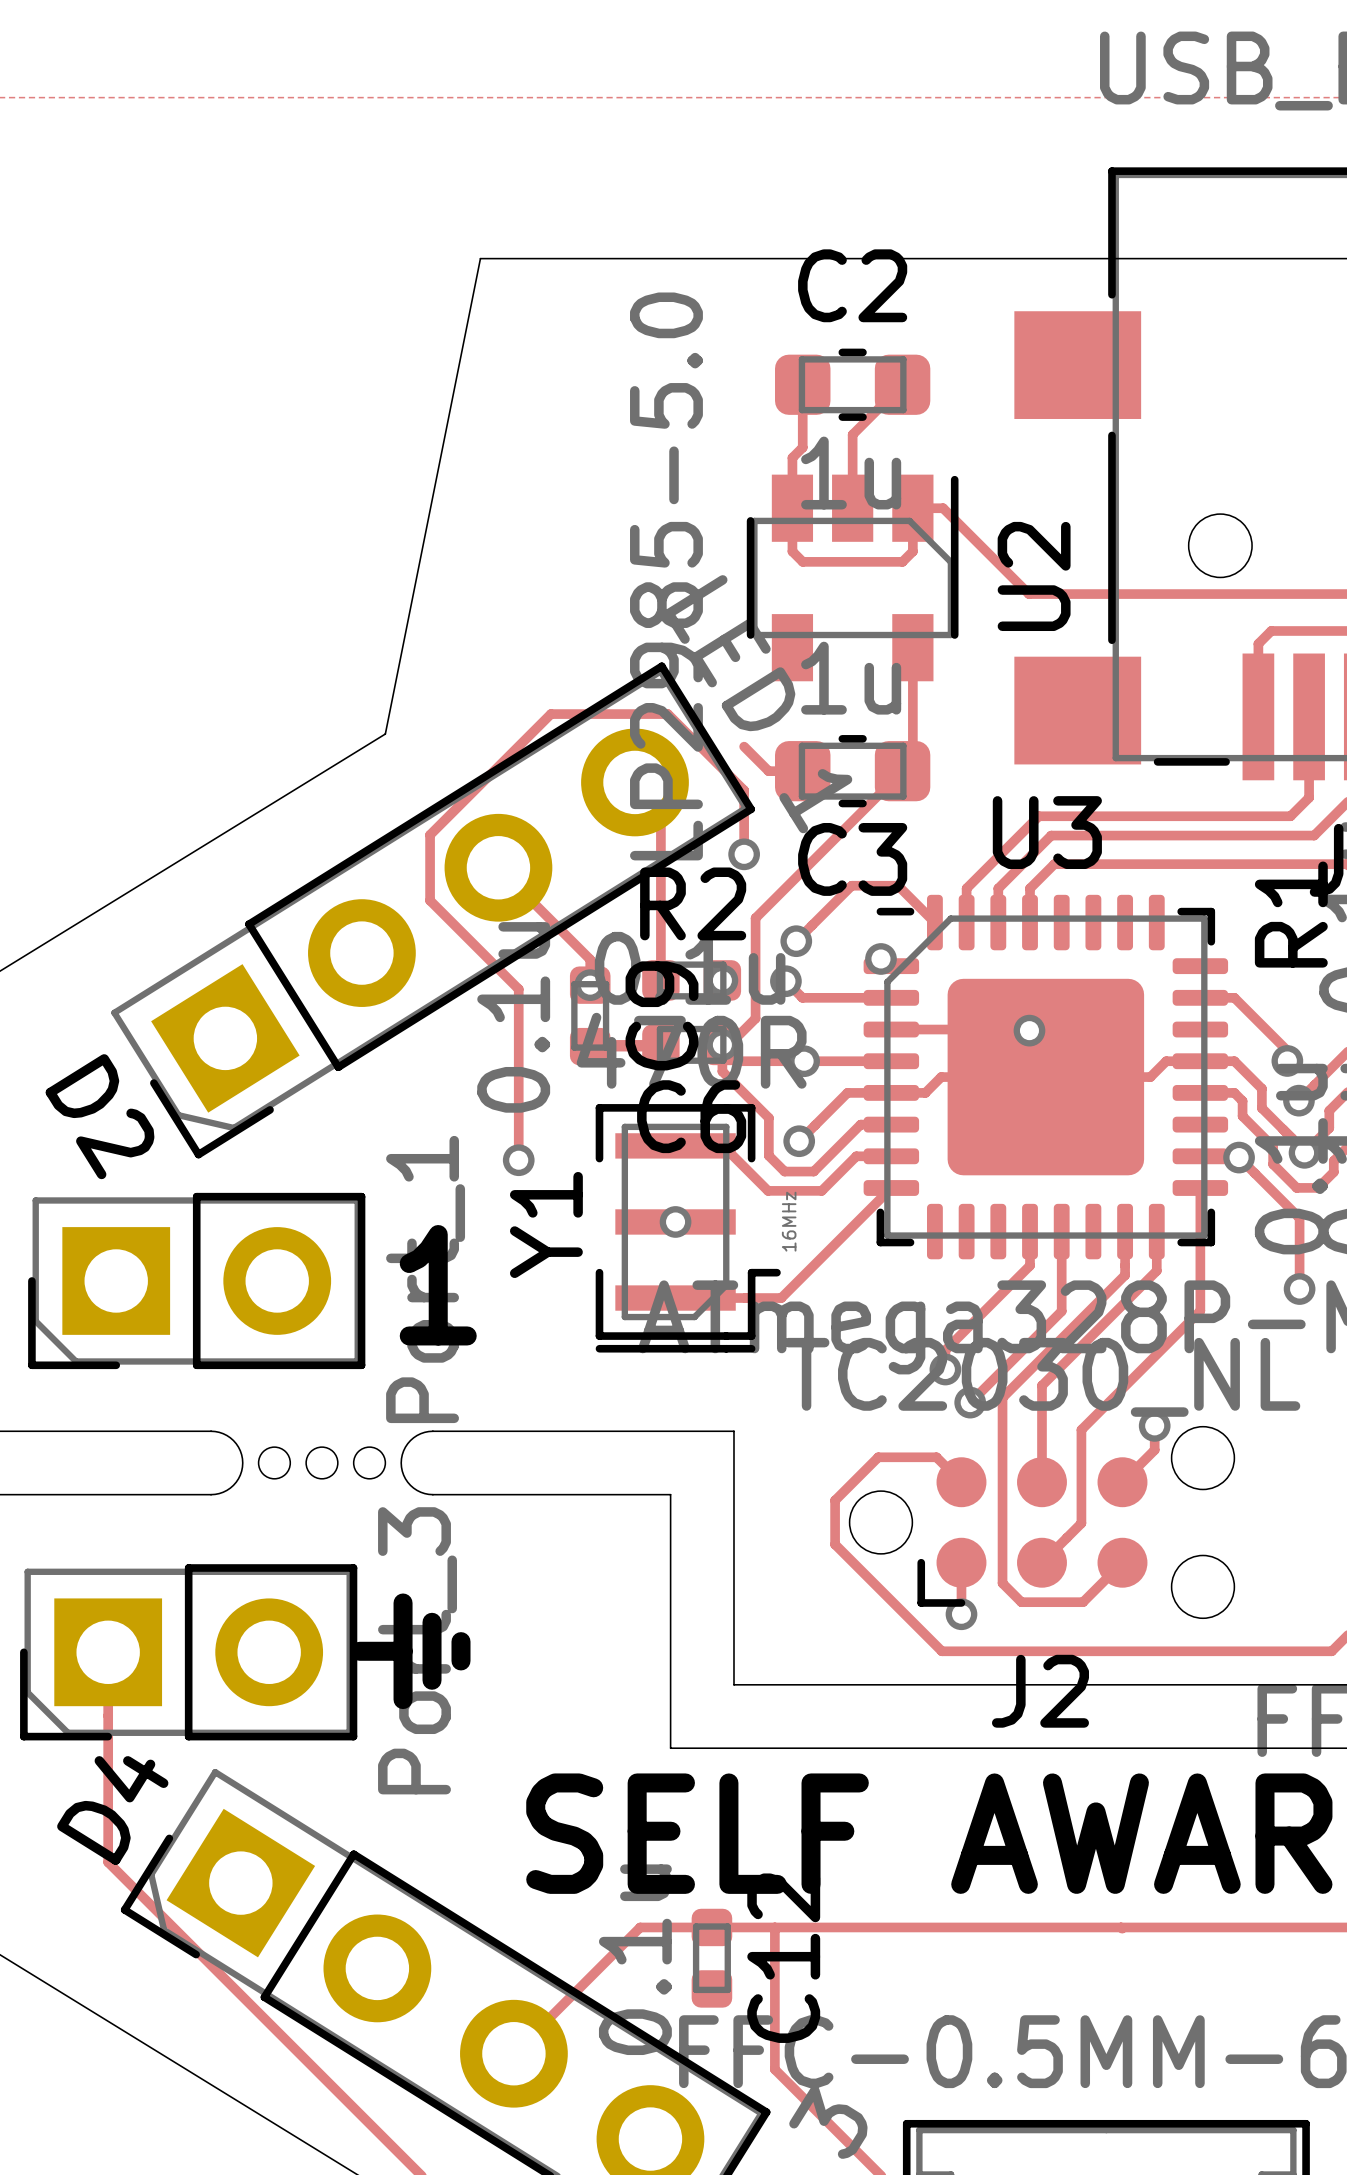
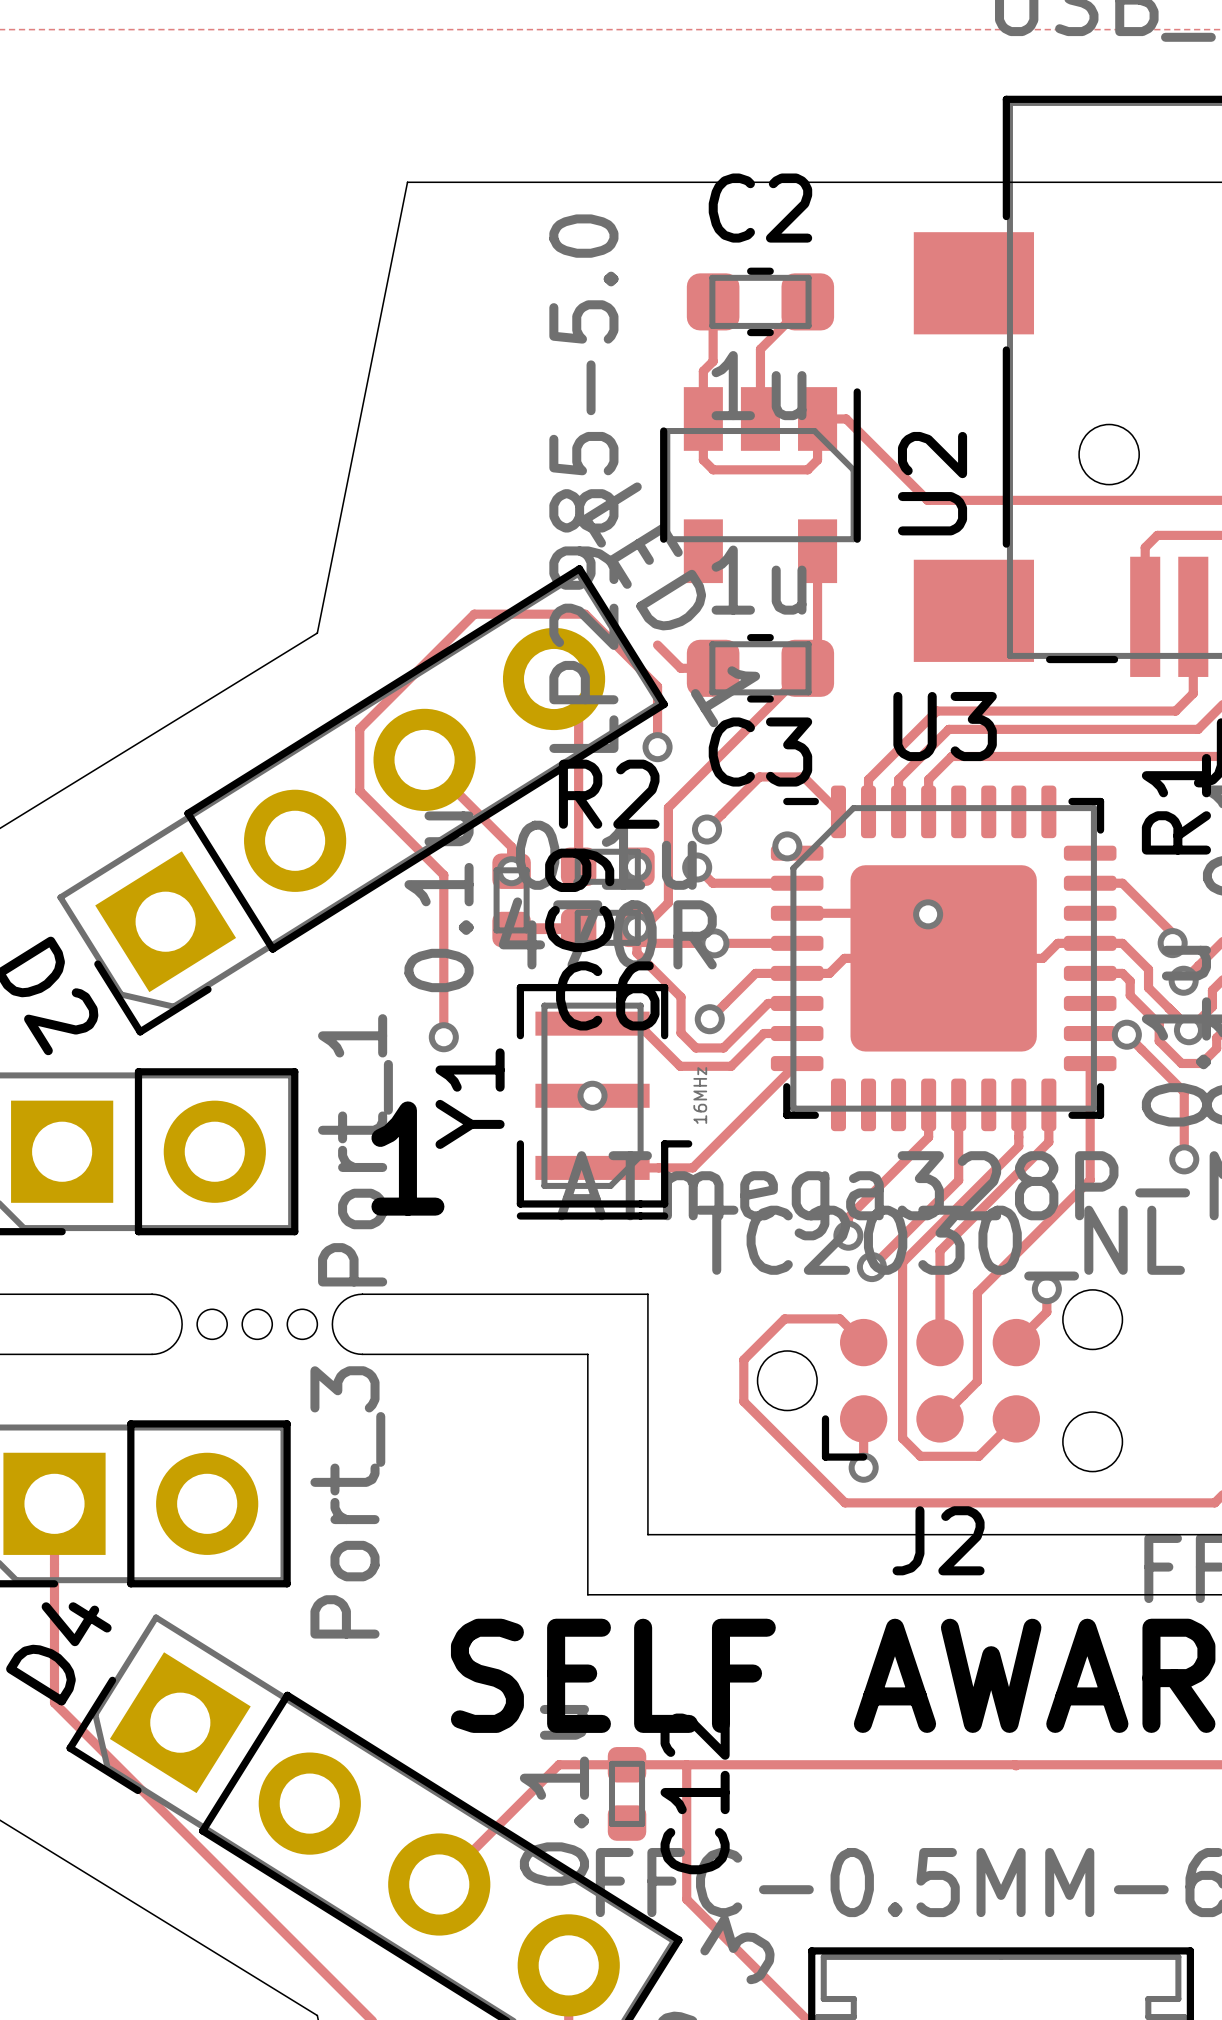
text position: 1 (438, 1285) -> 1 (407, 1158)
text: ⏚ (410, 1651) -> none

